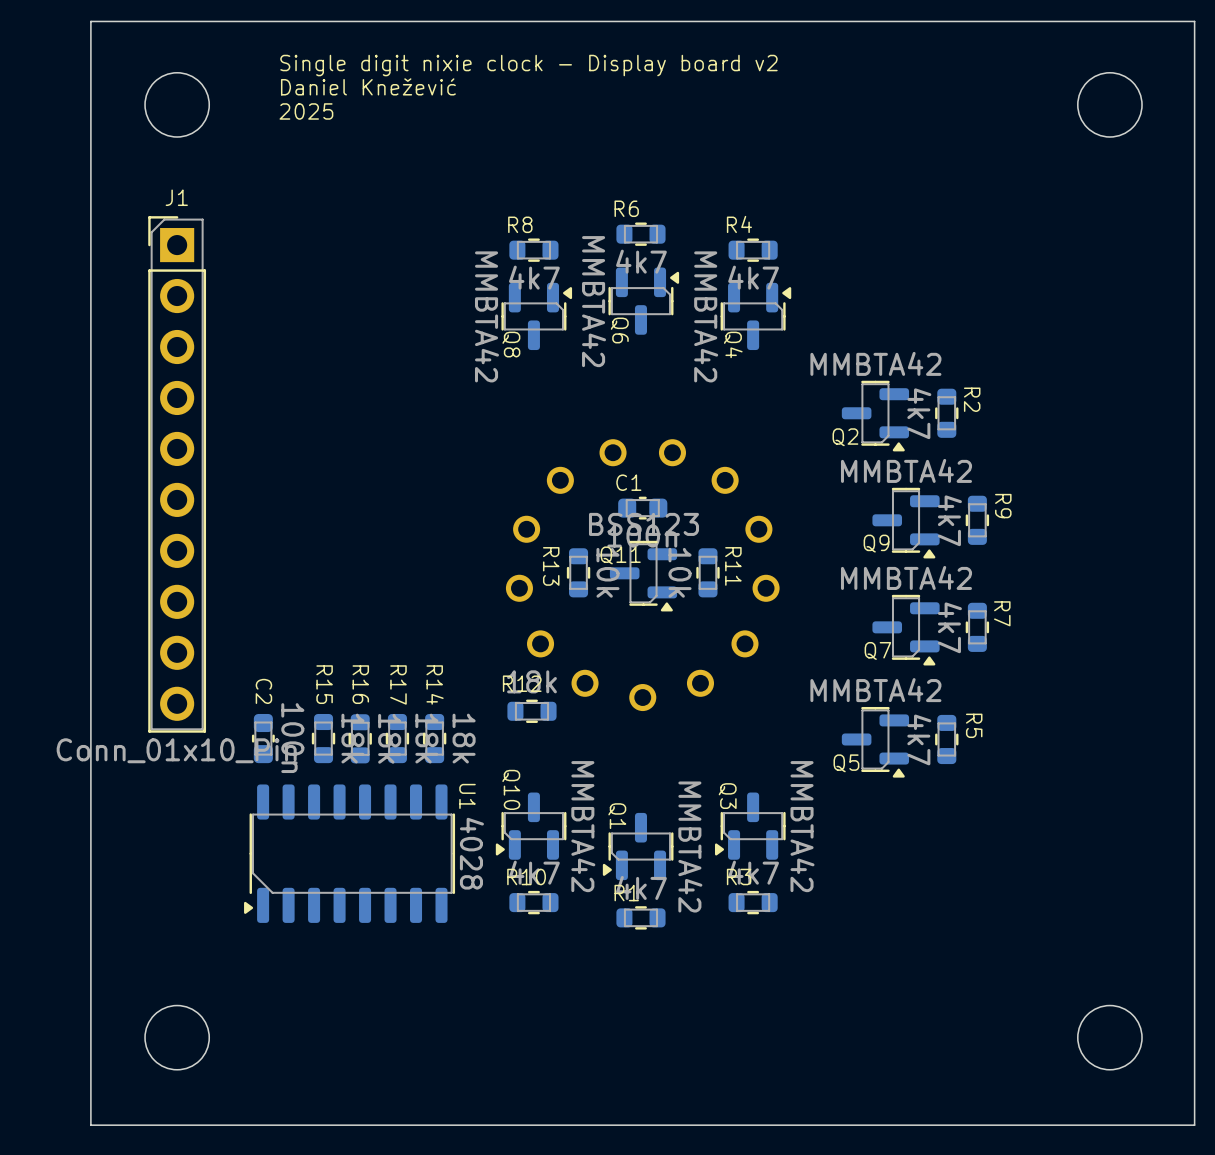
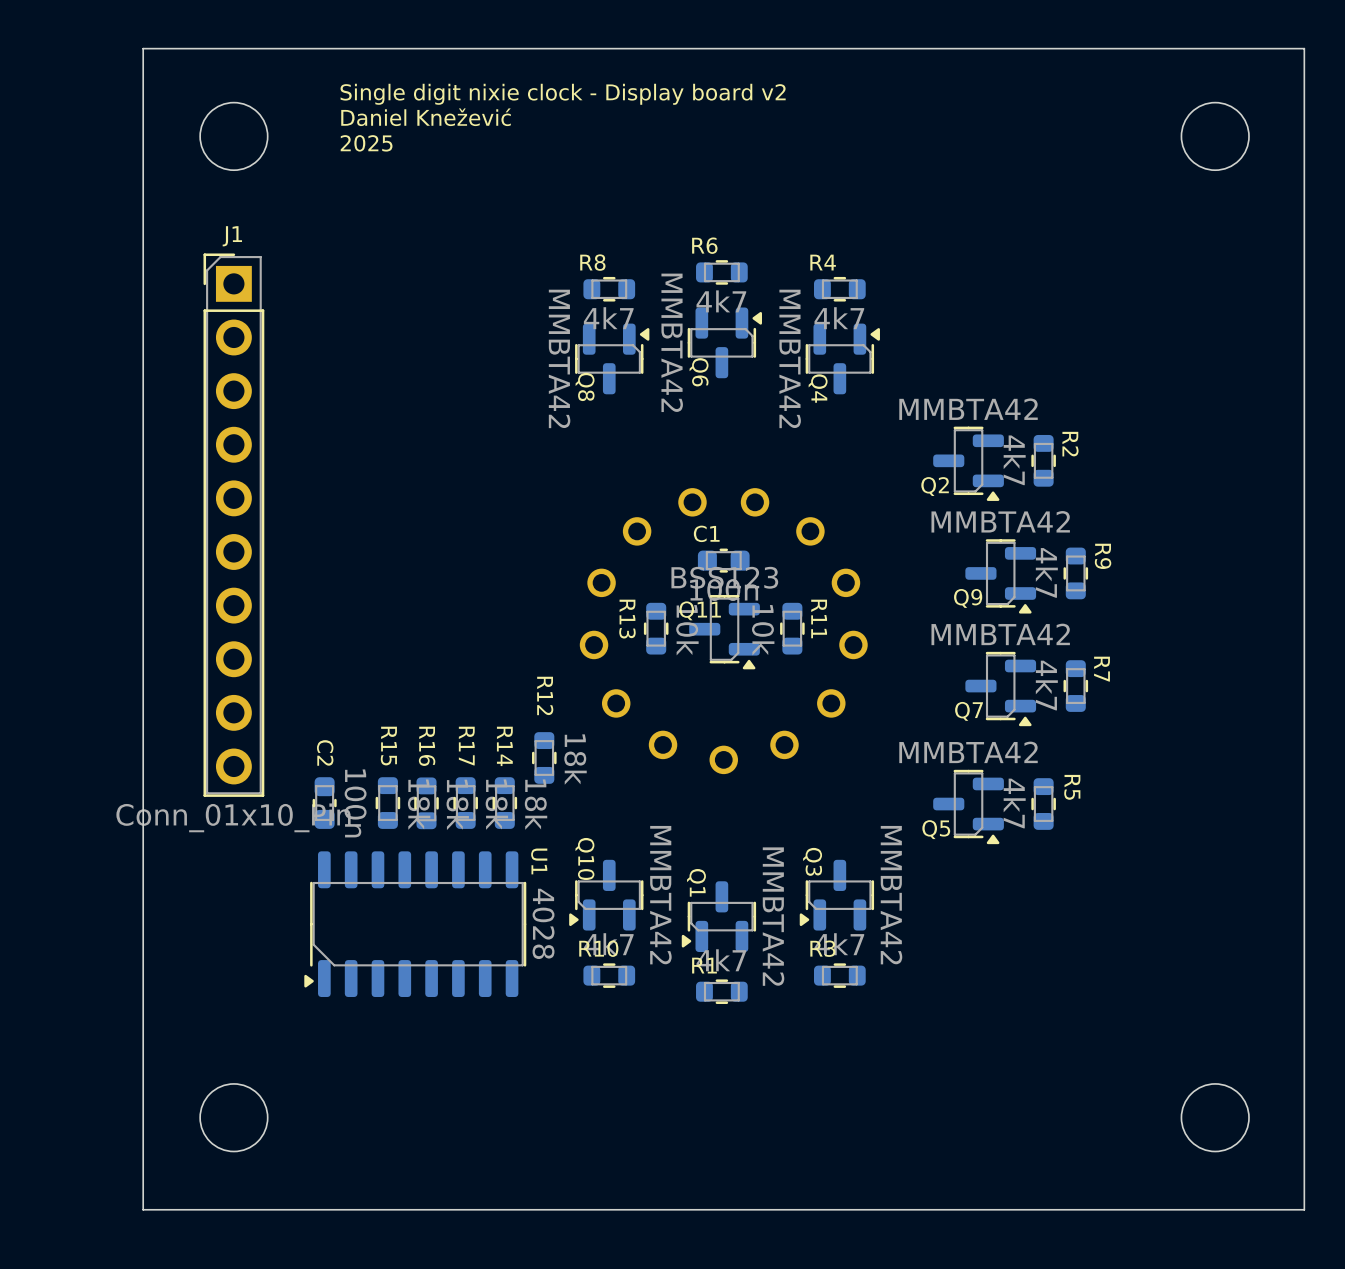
R12 rotation: 0° (531, 711) -> 90° clockwise (544, 757)
R12 position: (531, 711) -> (544, 757)

